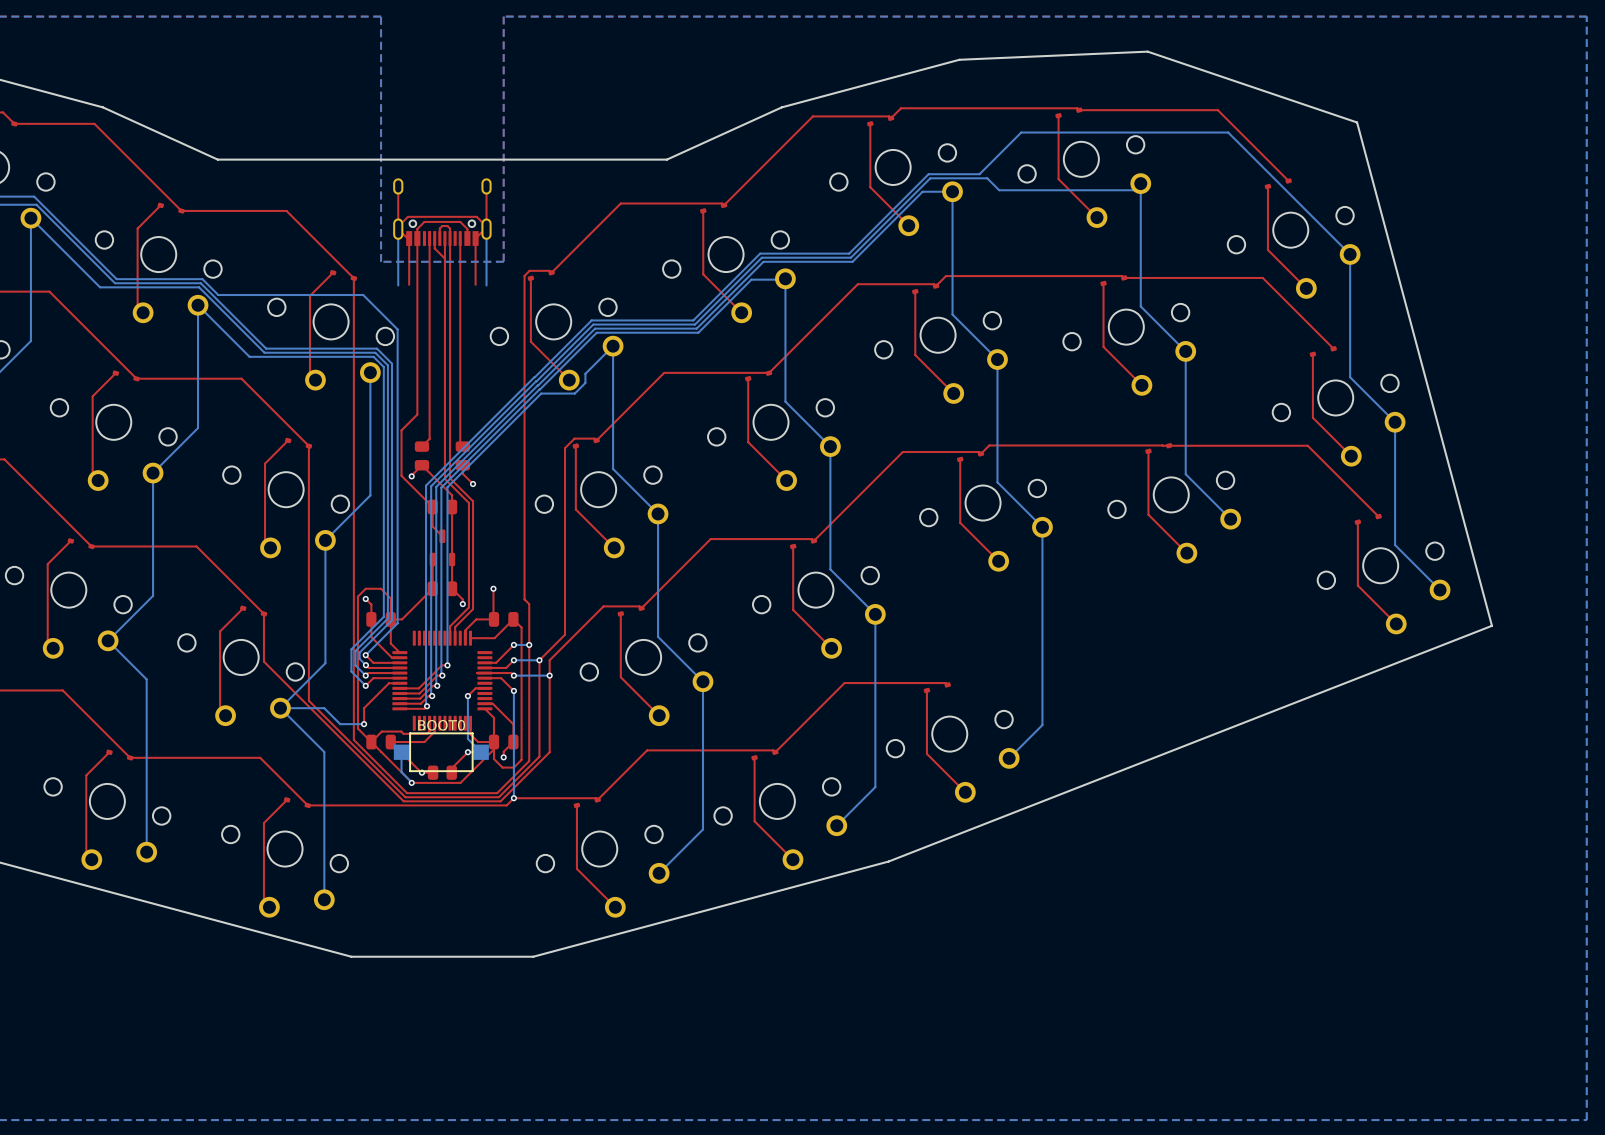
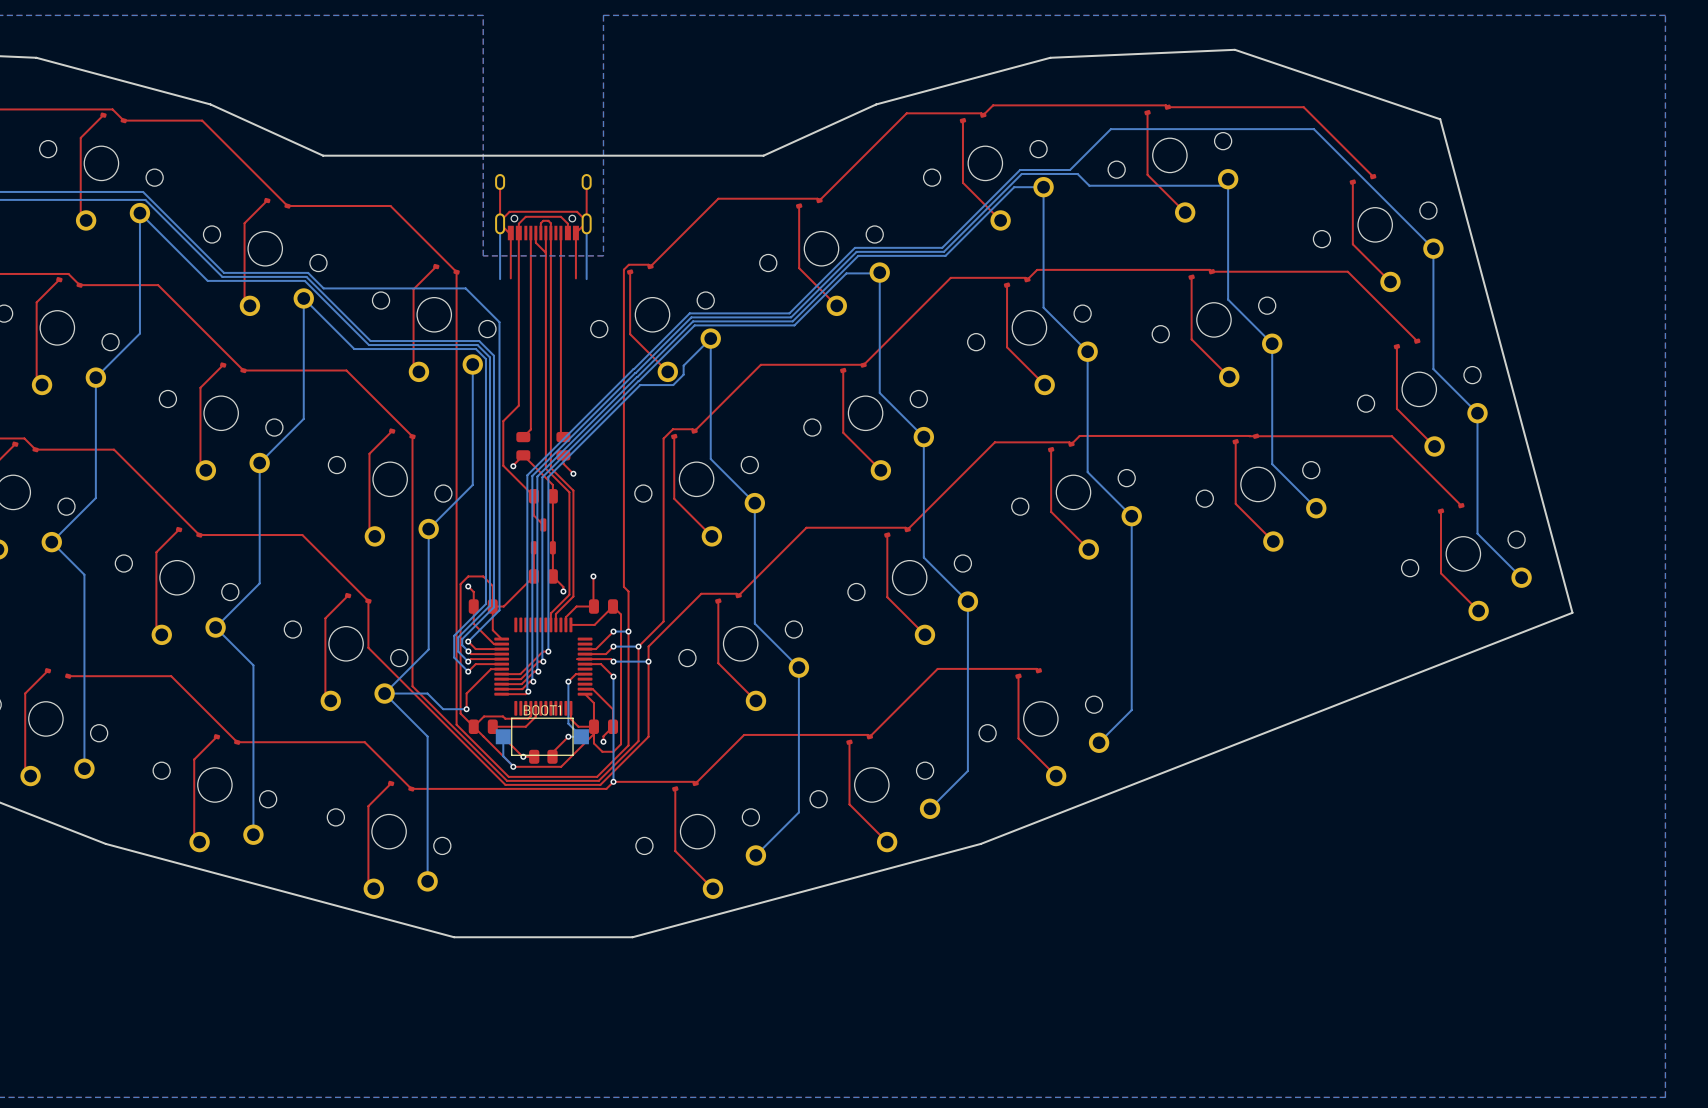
BOOT0 name: BOOT0 (441, 725) -> BOOT1 (542, 710)

